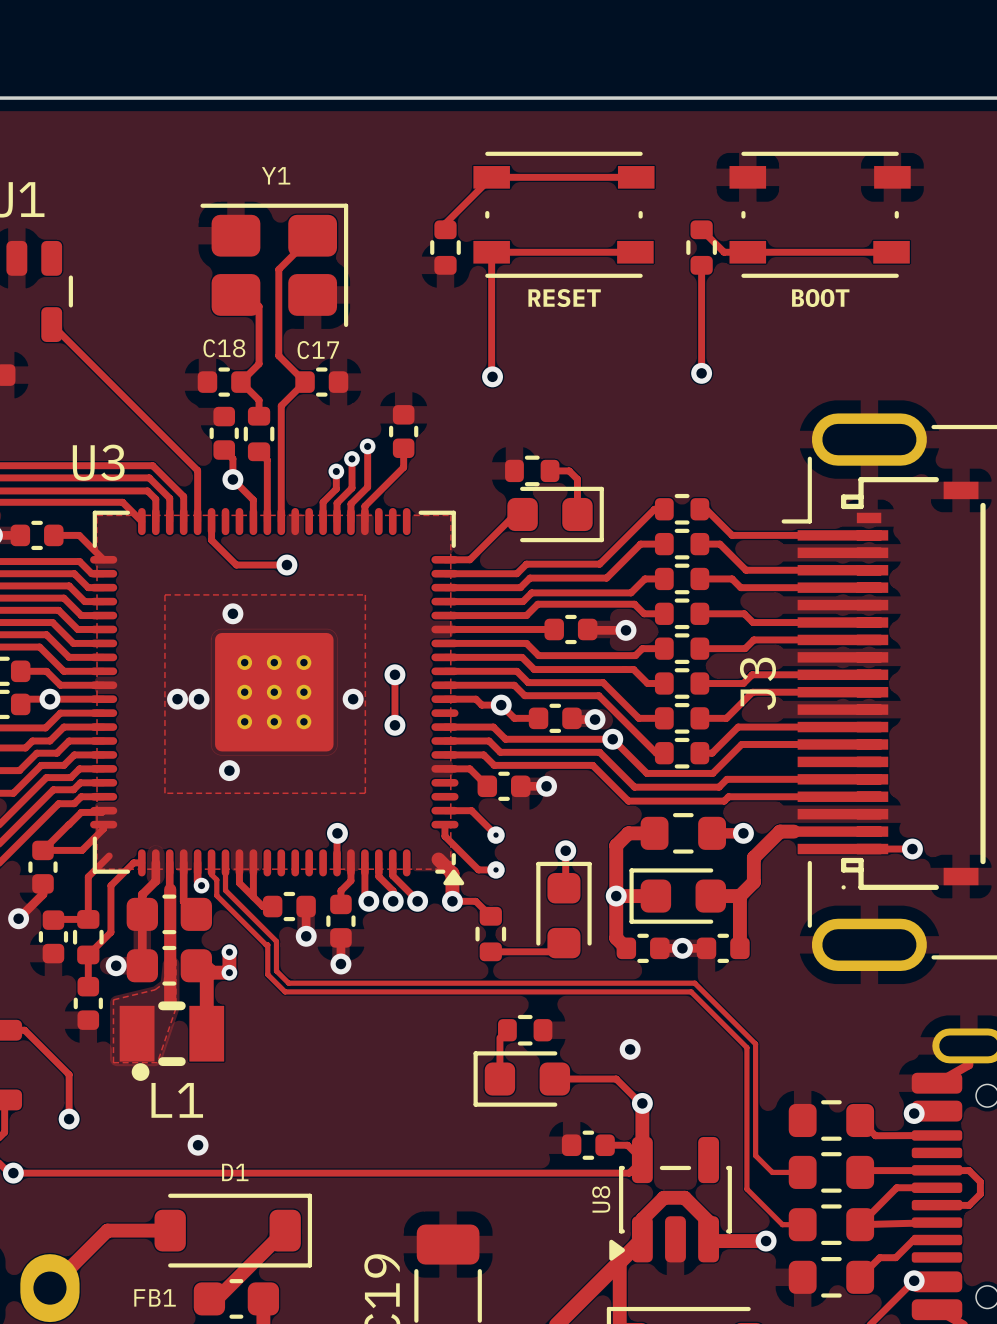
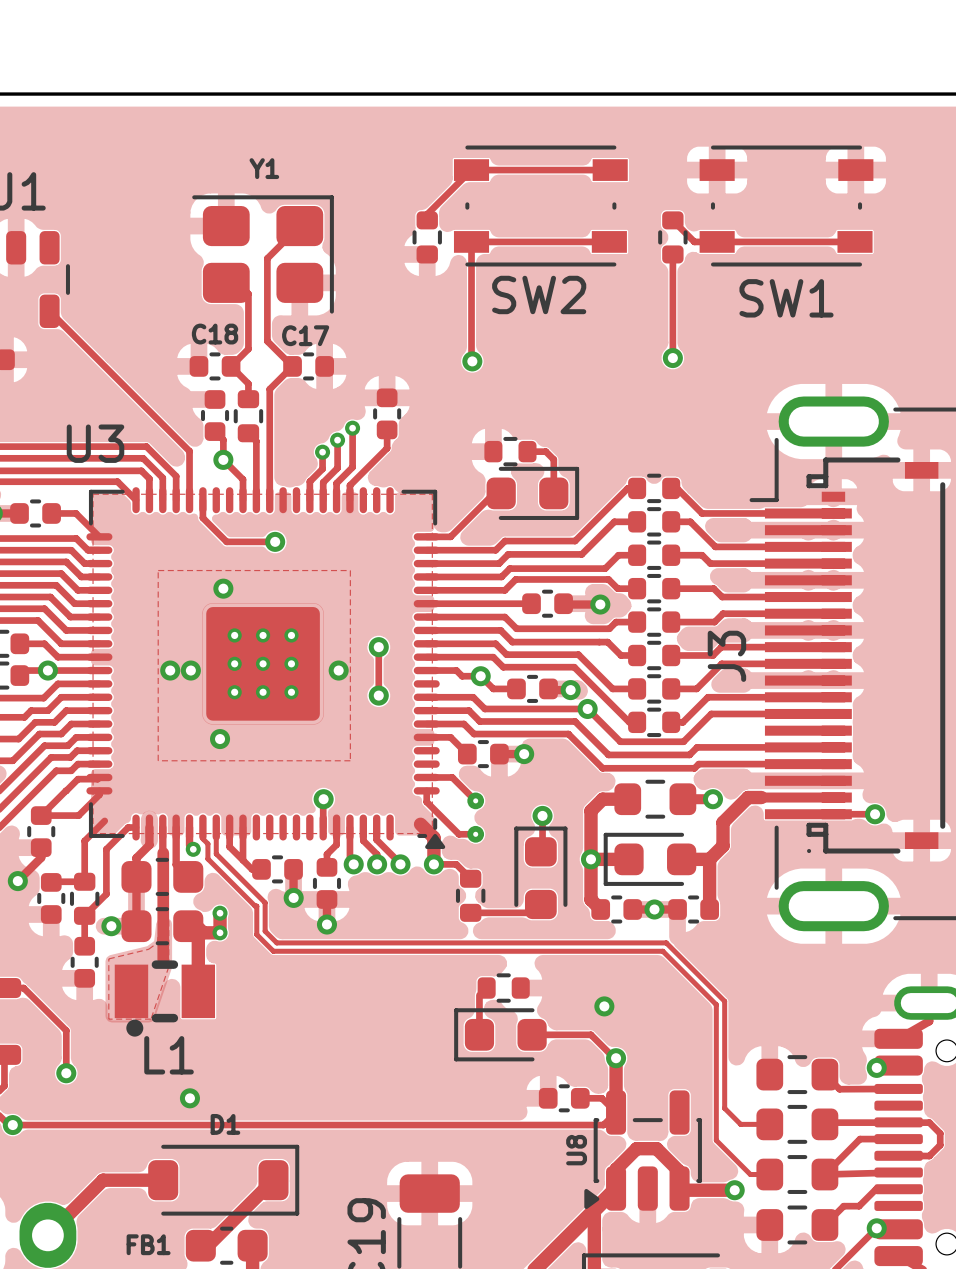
text: RESET (564, 298) -> none
text: BOOT (820, 298) -> none
SW2 name: none -> SW2 (539, 294)
SW1 name: none -> SW1 (786, 298)

